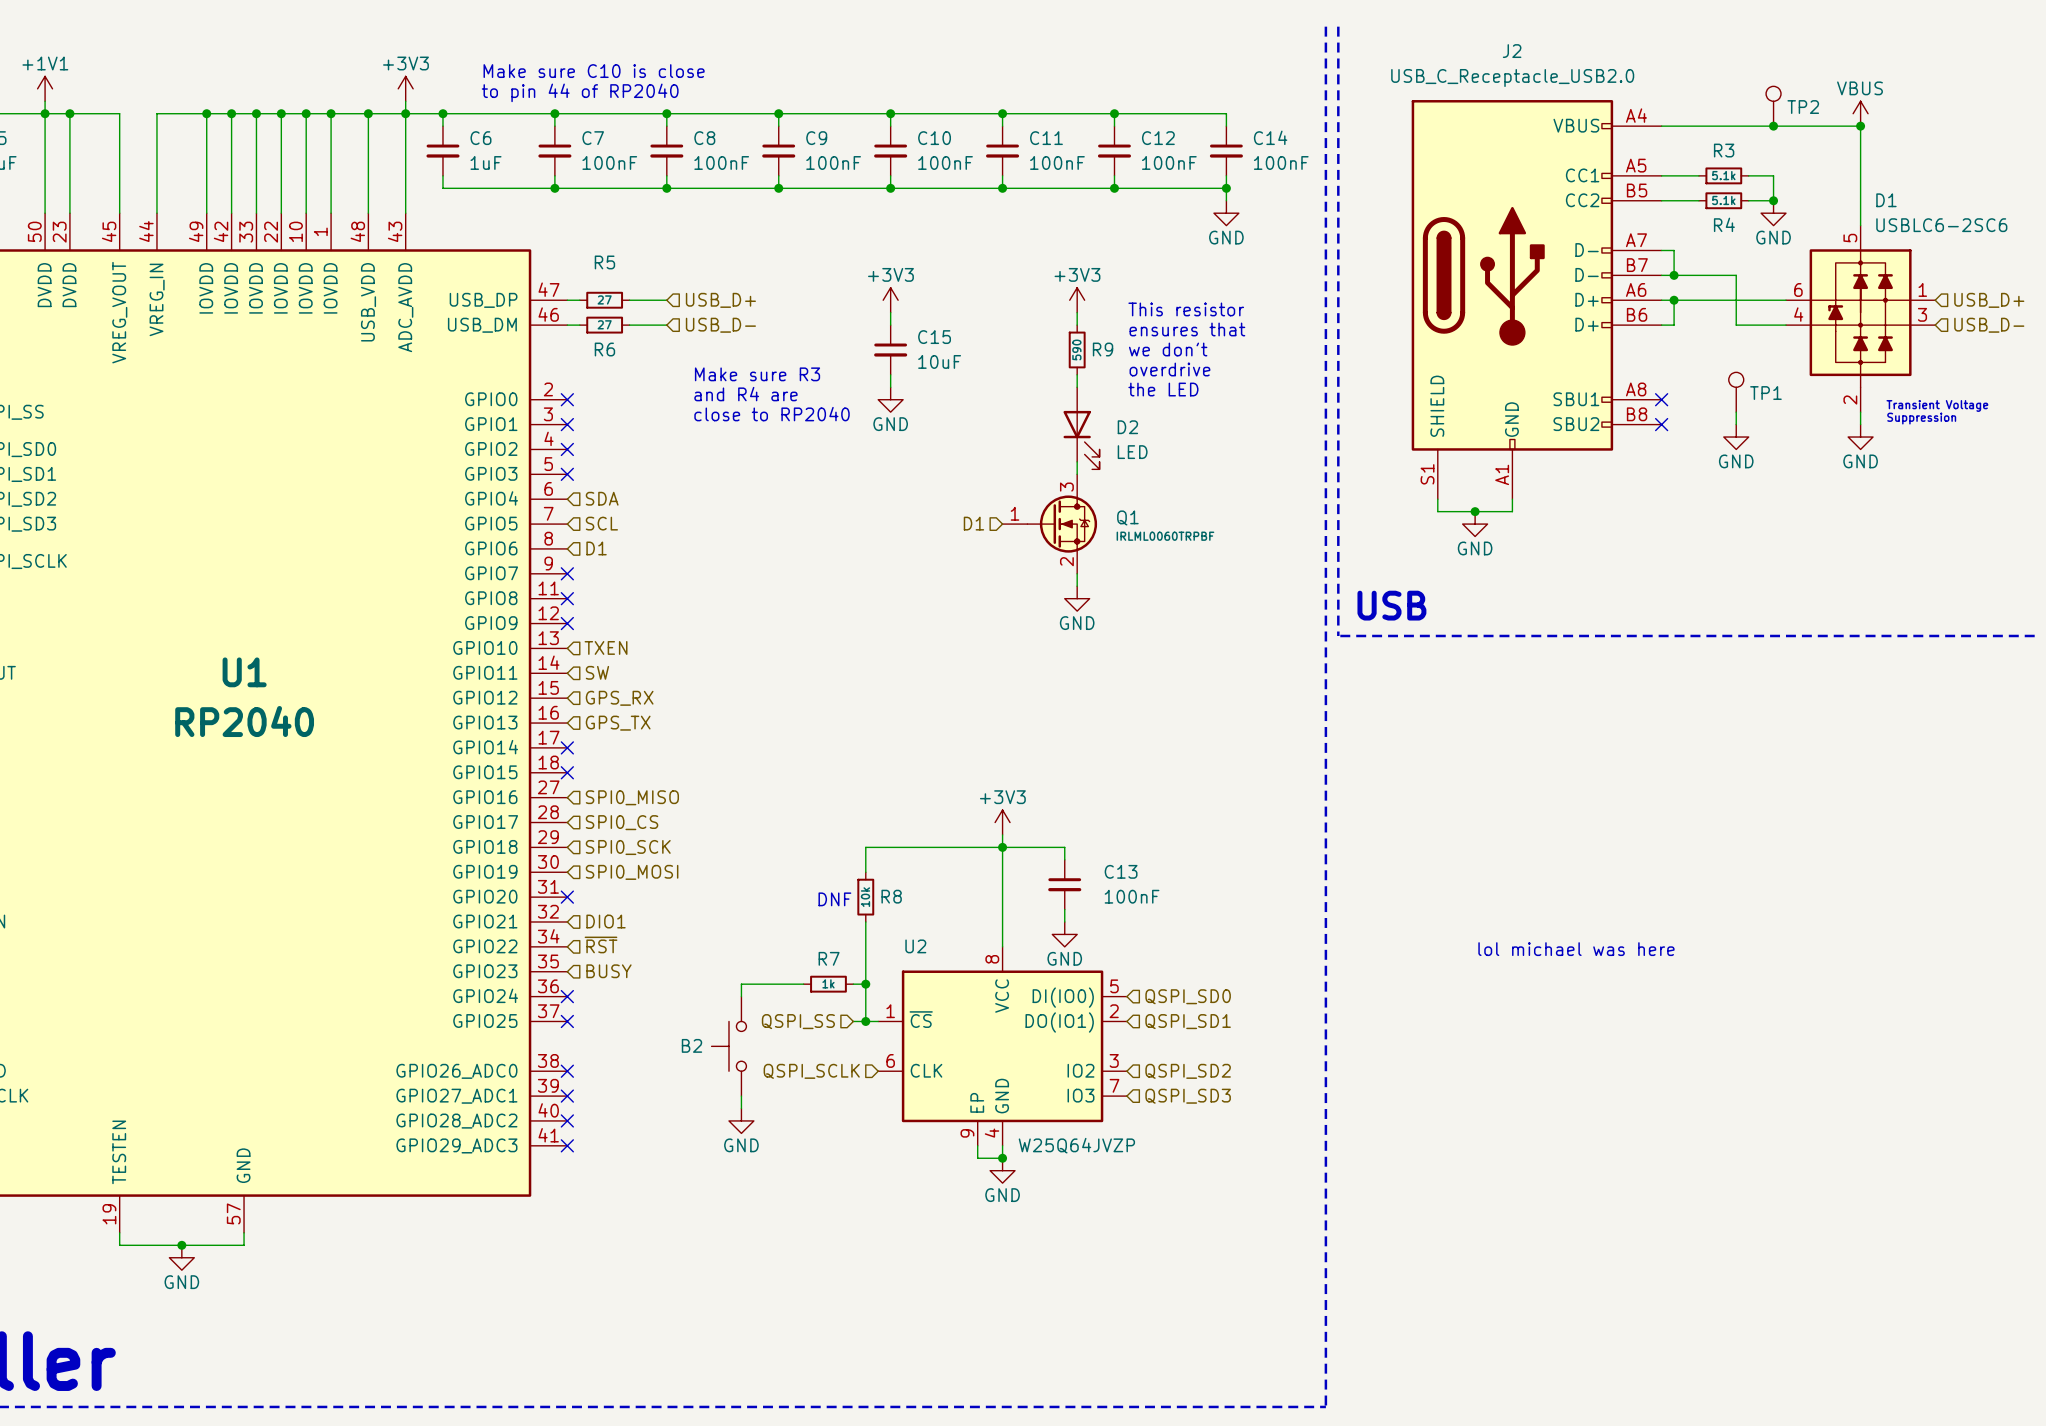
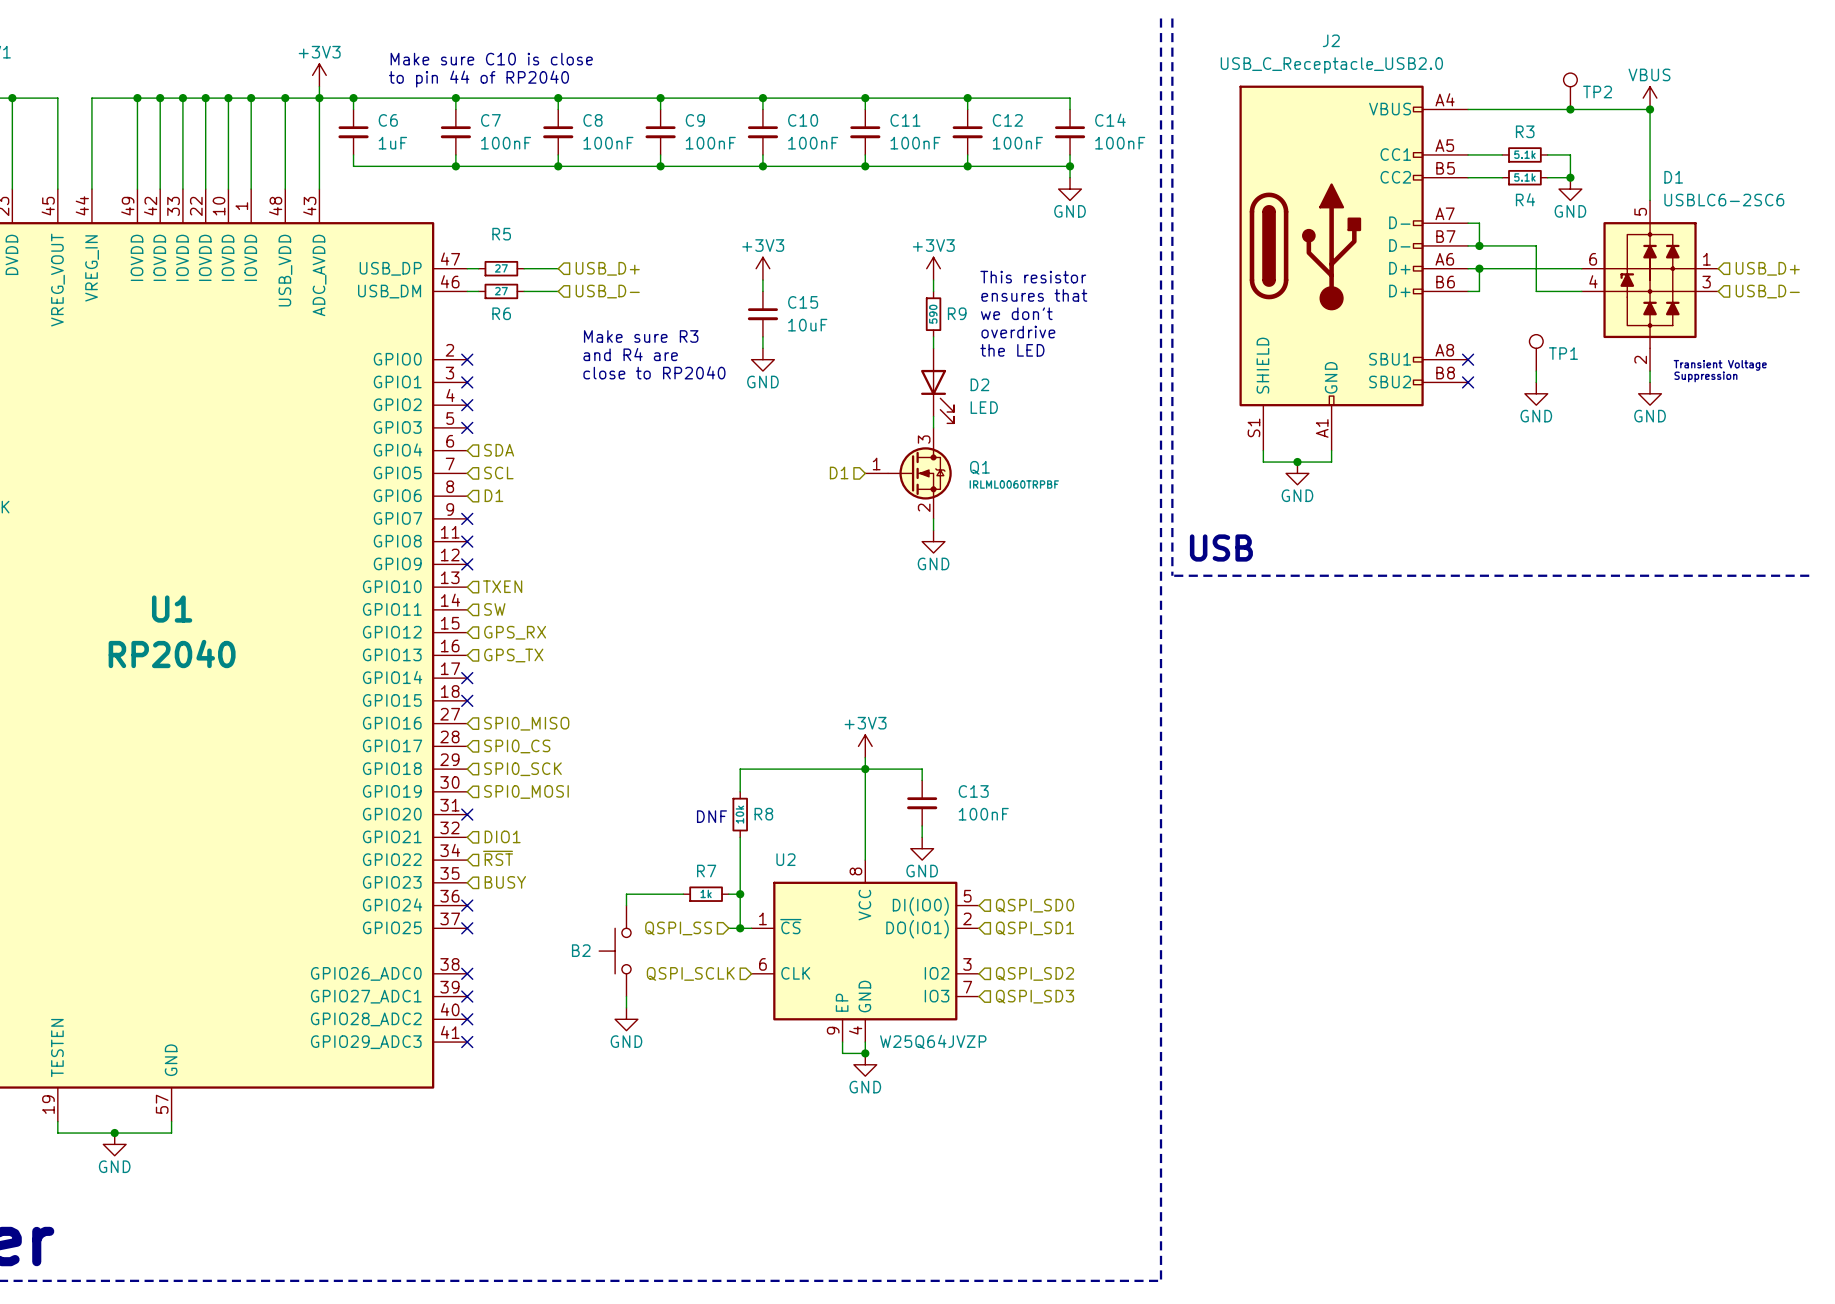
text: lol michael was here (1576, 949) -> none

